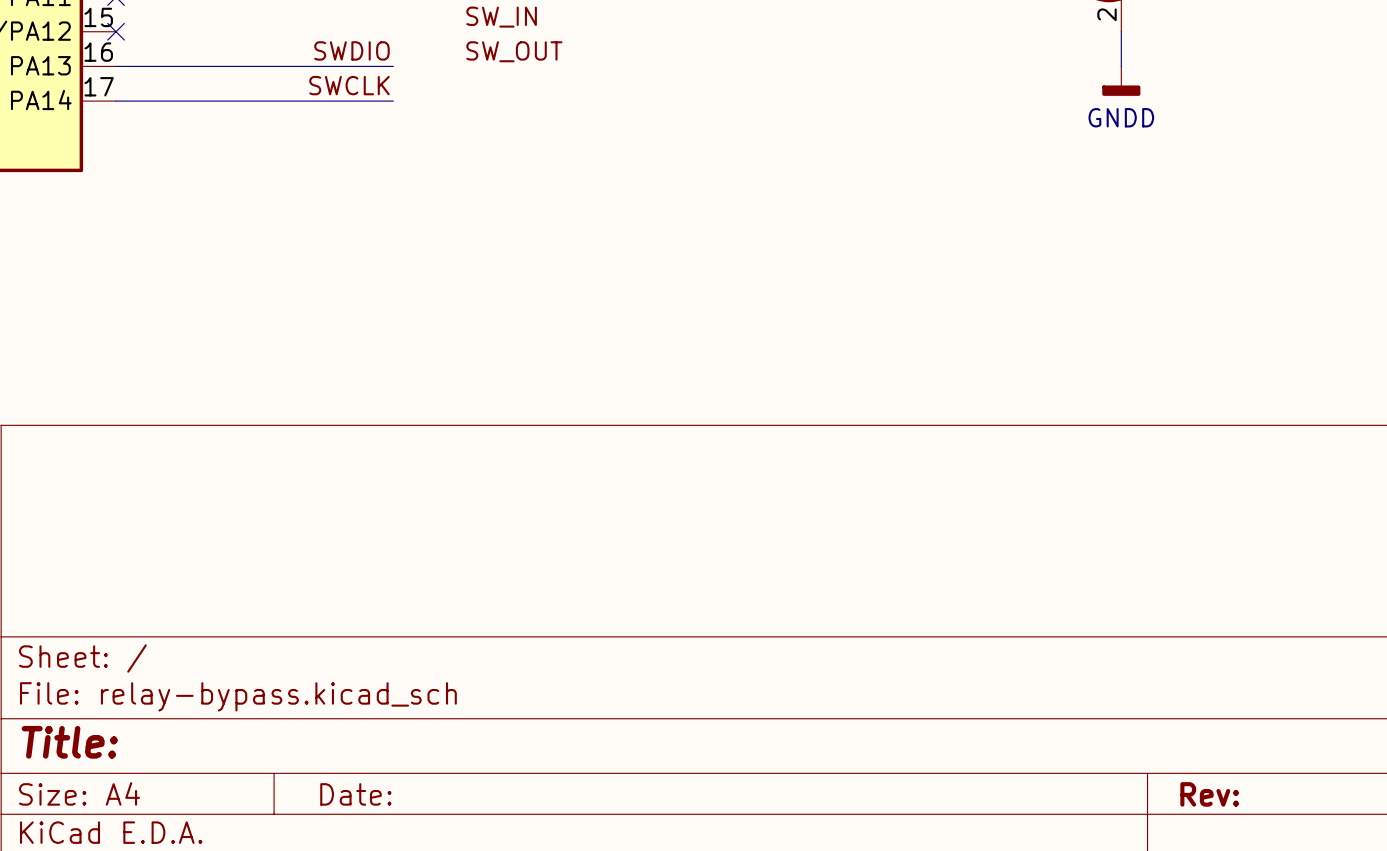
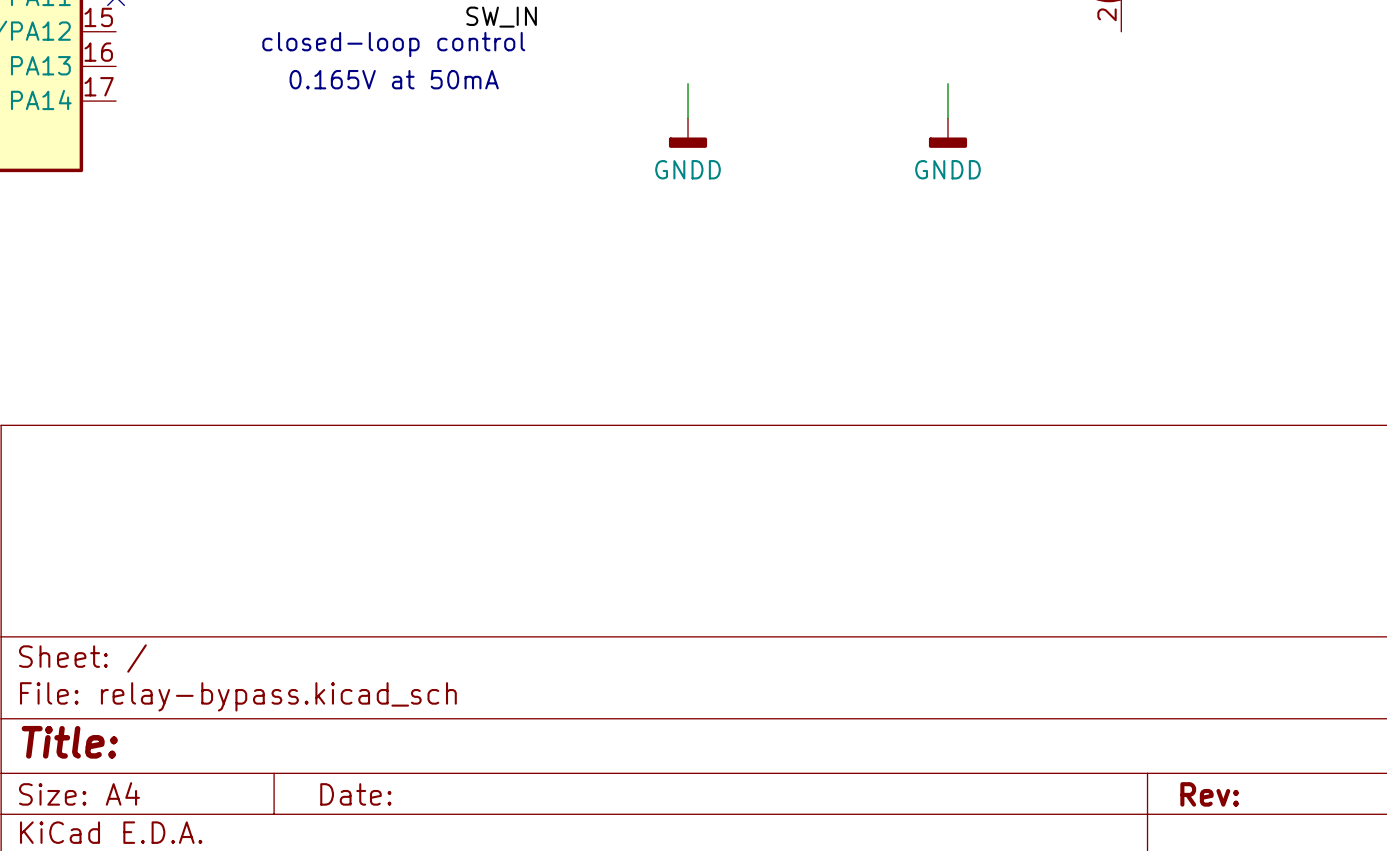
no-connect mark: (116, 31) -> none
wire: (1121, 31) (1121, 66) -> (947, 83) (947, 118)
text: none -> closed-loop control (393, 44)
label: SWDIO (351, 50) -> none
label: SW_OUT (514, 51) -> none
wire: (116, 66) (393, 66) -> none
text: none -> 0.165V at 50mA (394, 79)
power symbol position: GNDD (1121, 81) -> GNDD (947, 133)
wire: none -> (688, 83) (688, 118)
label: SWCLK (349, 85) -> none
wire: (116, 101) (393, 101) -> none
power symbol: none -> GNDD (688, 133)

